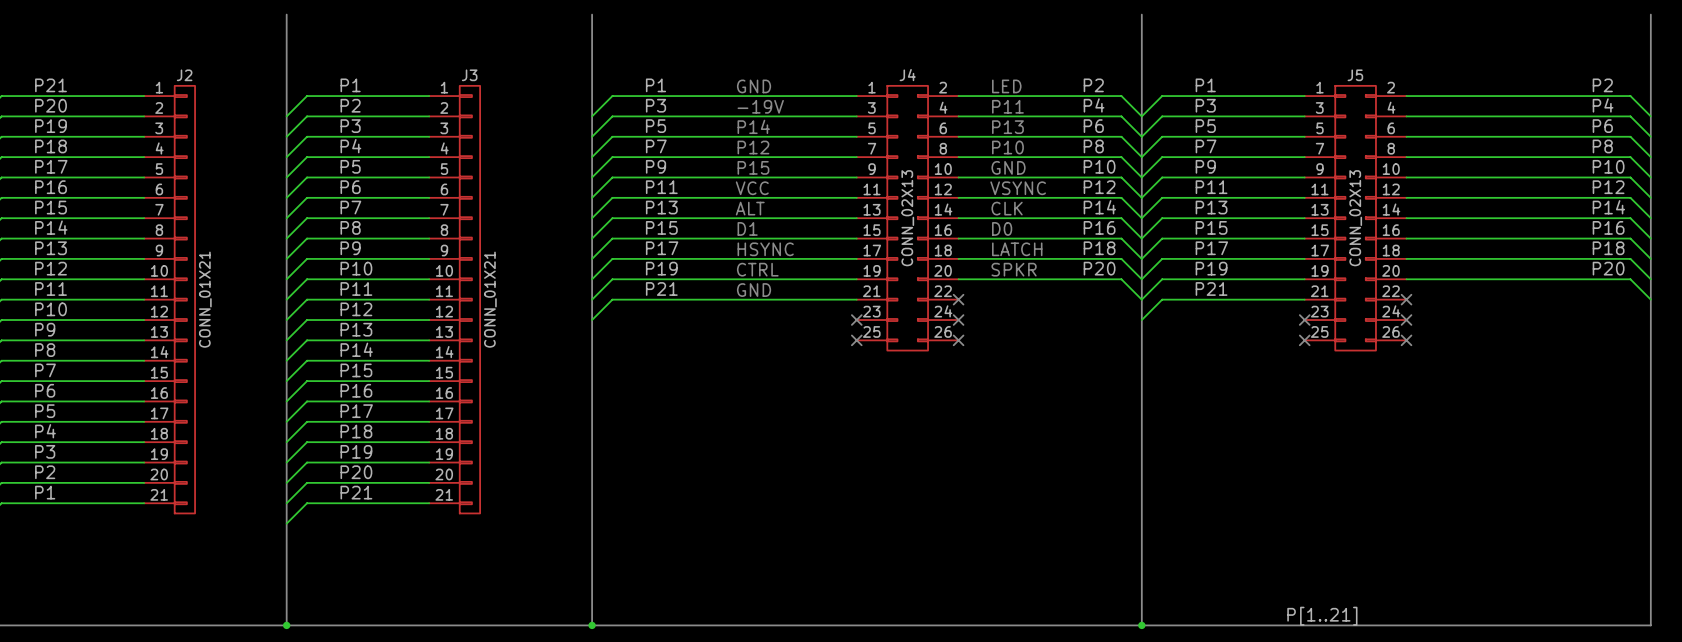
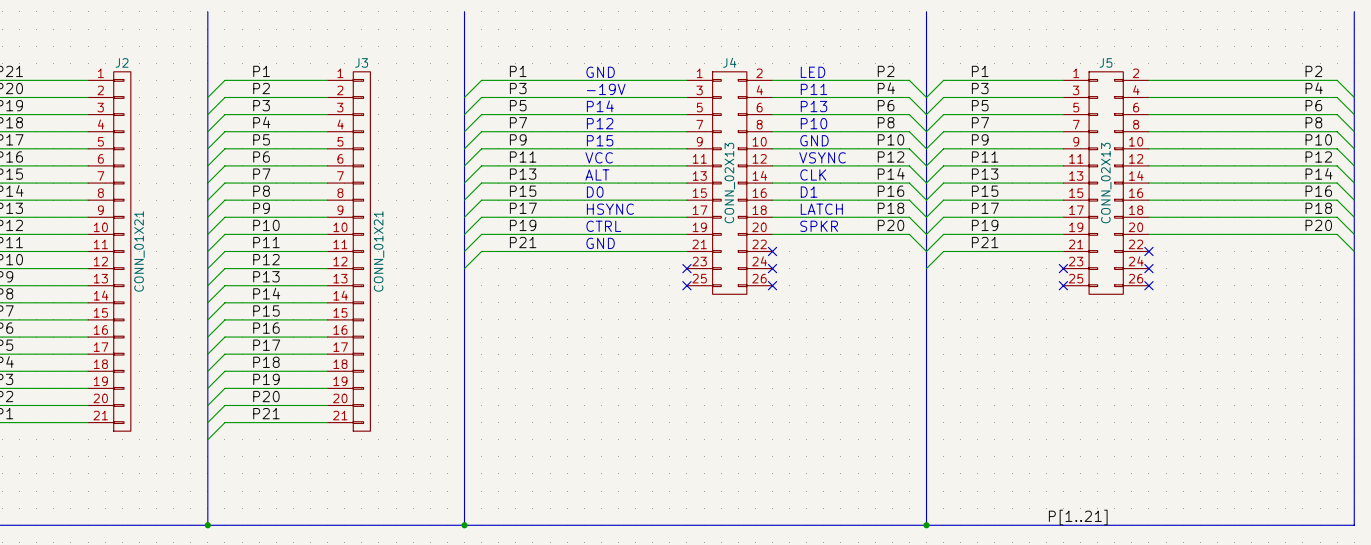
text: D1 (747, 228) -> D0 (595, 192)
text: D0 (1002, 228) -> D1 (809, 192)

